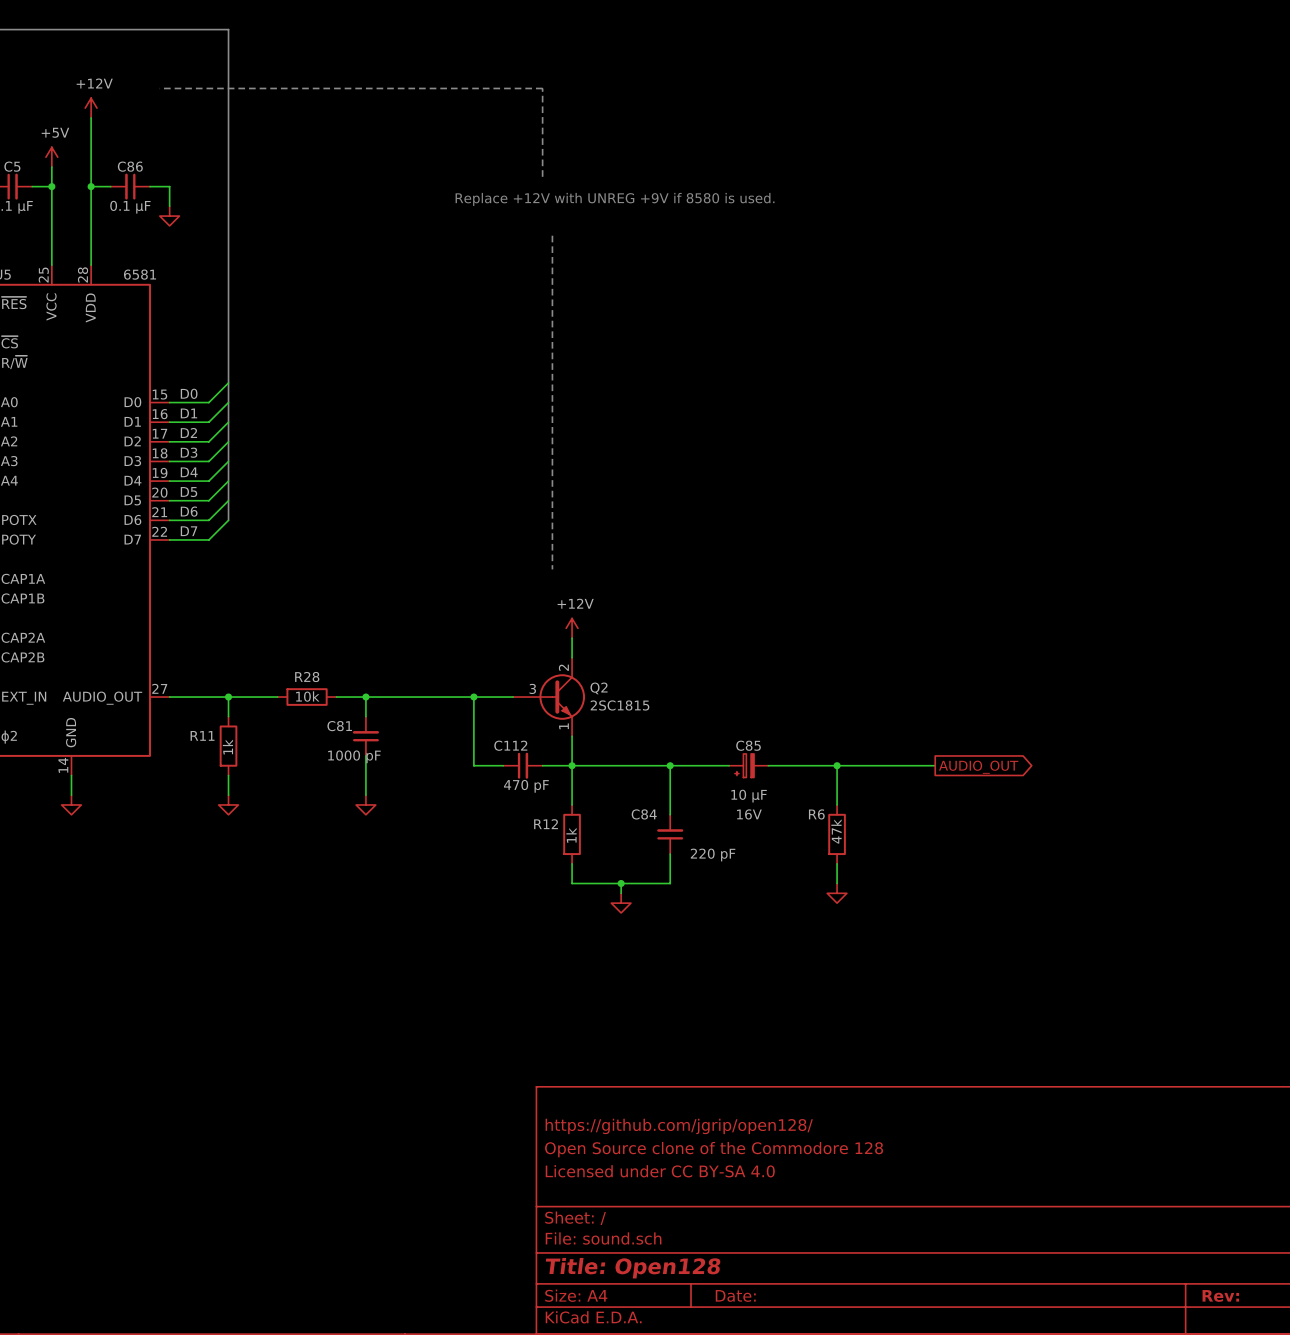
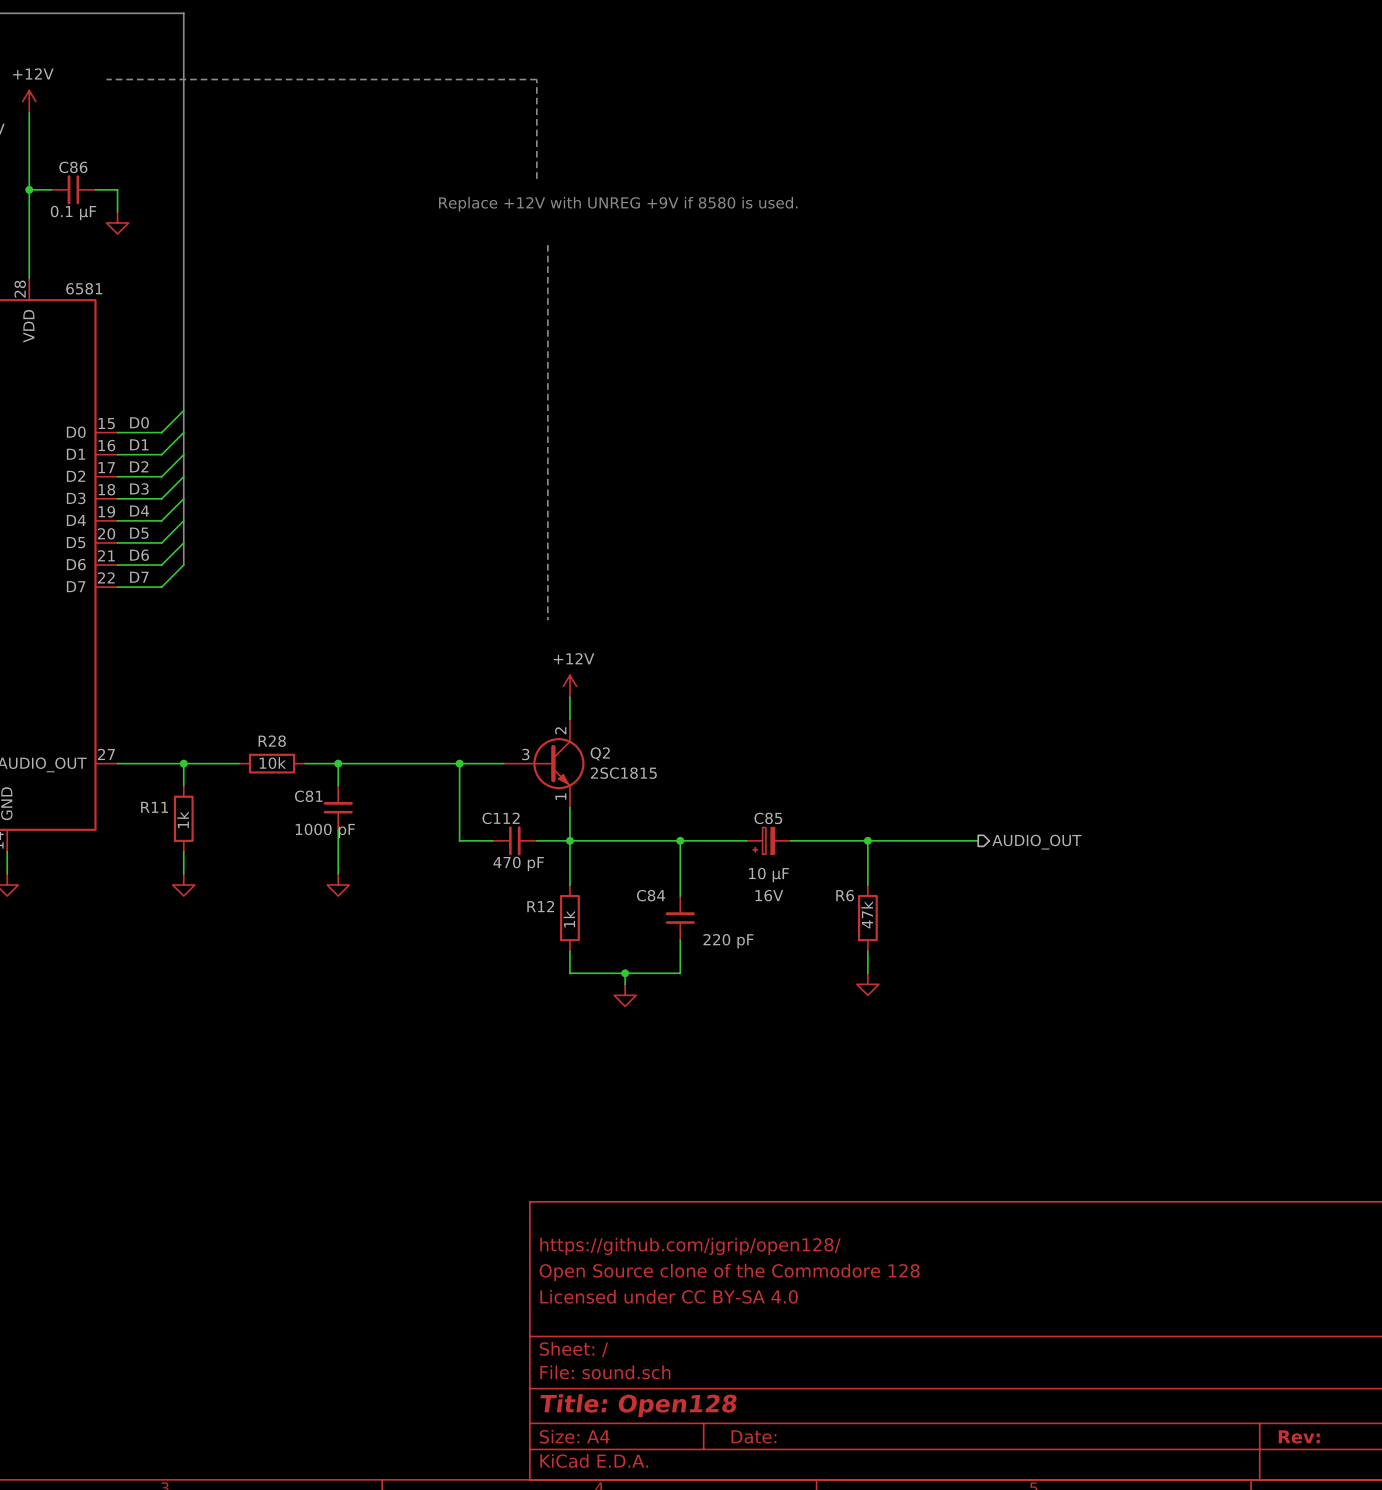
hierarchical label: none -> AUDIO_OUT (1036, 842)
global label: AUDIO_OUT (978, 767) -> none

